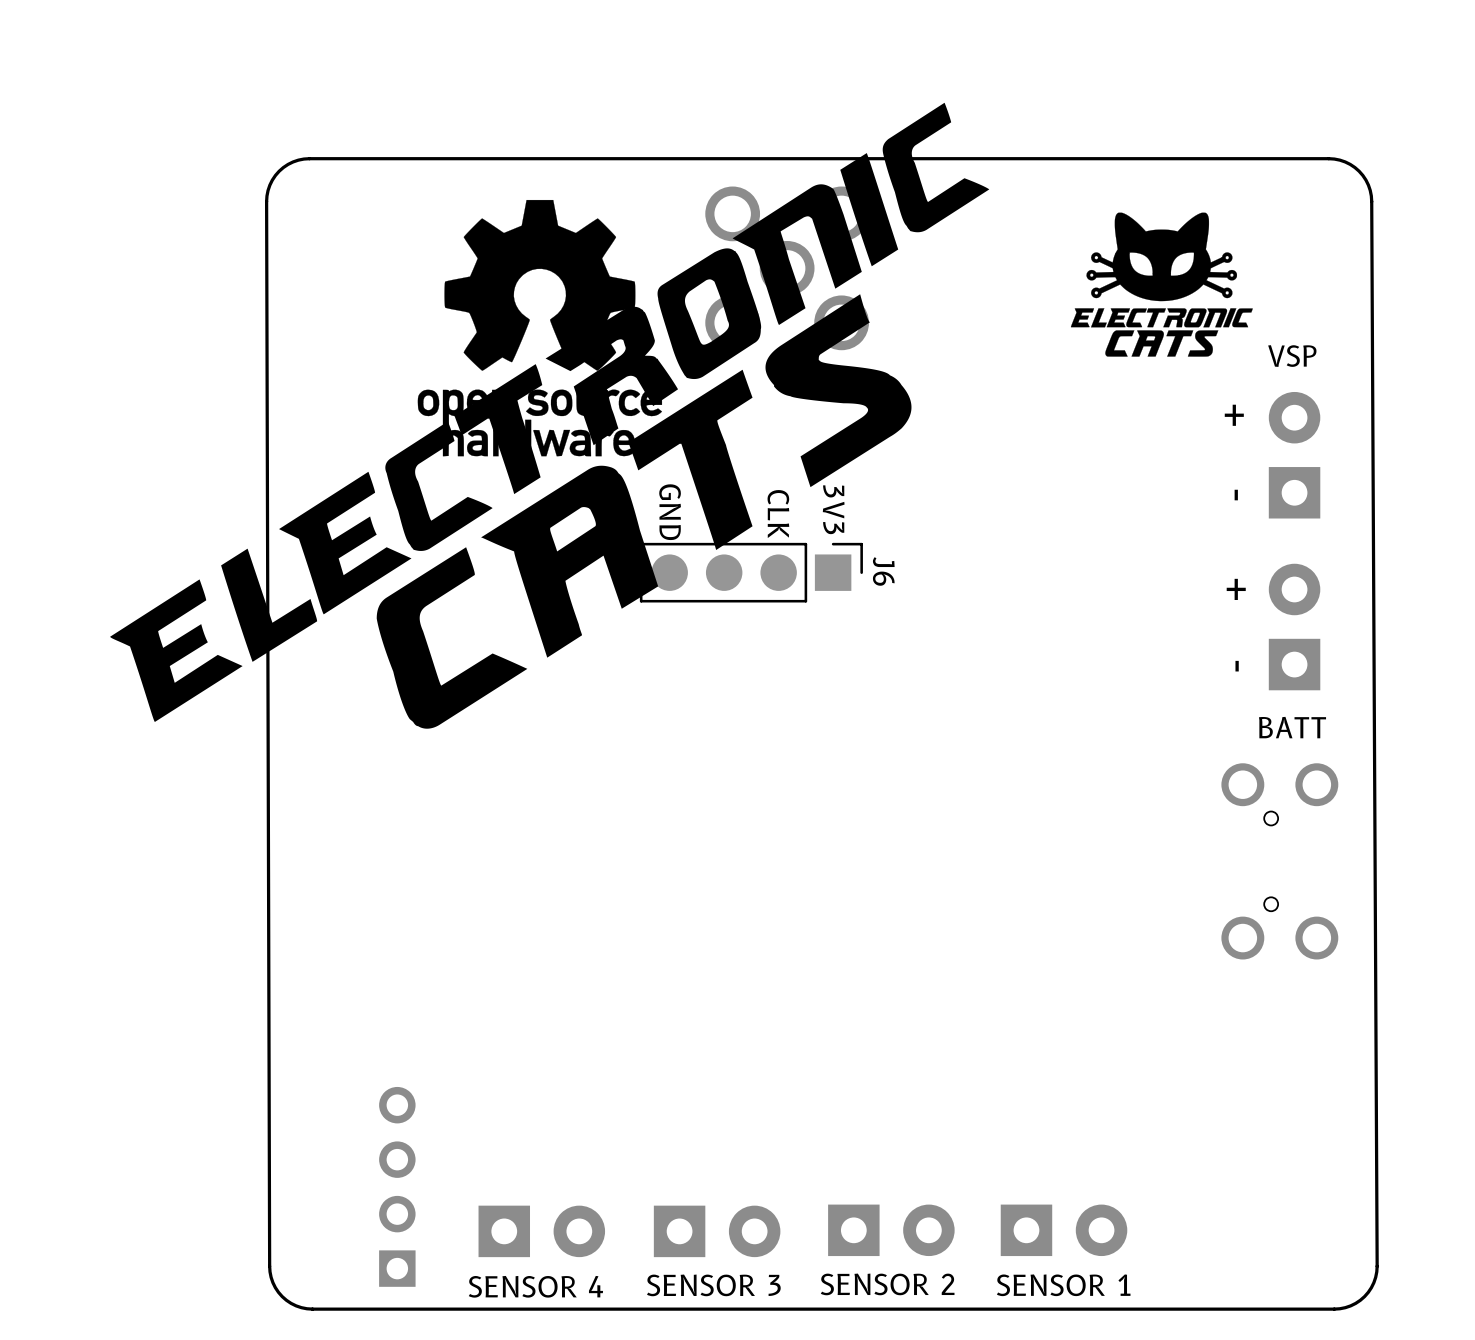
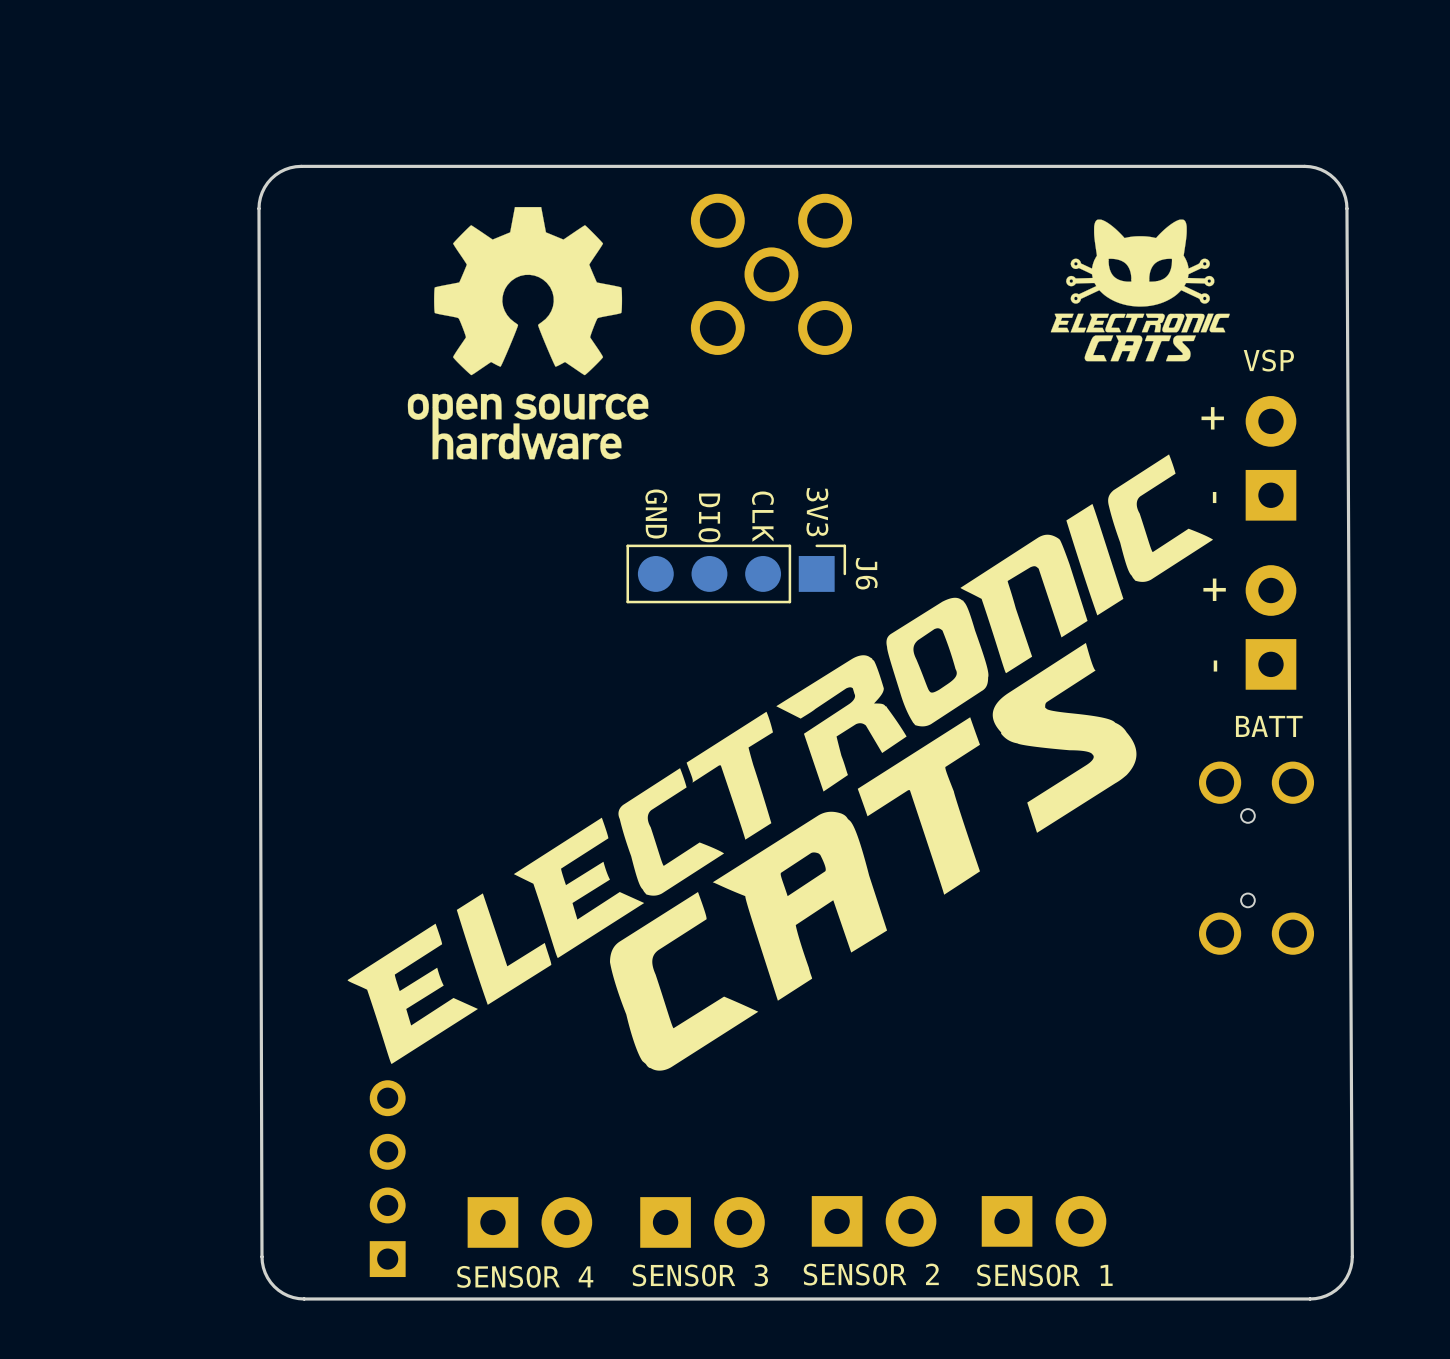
drawing position: (549, 415) -> (780, 762)

